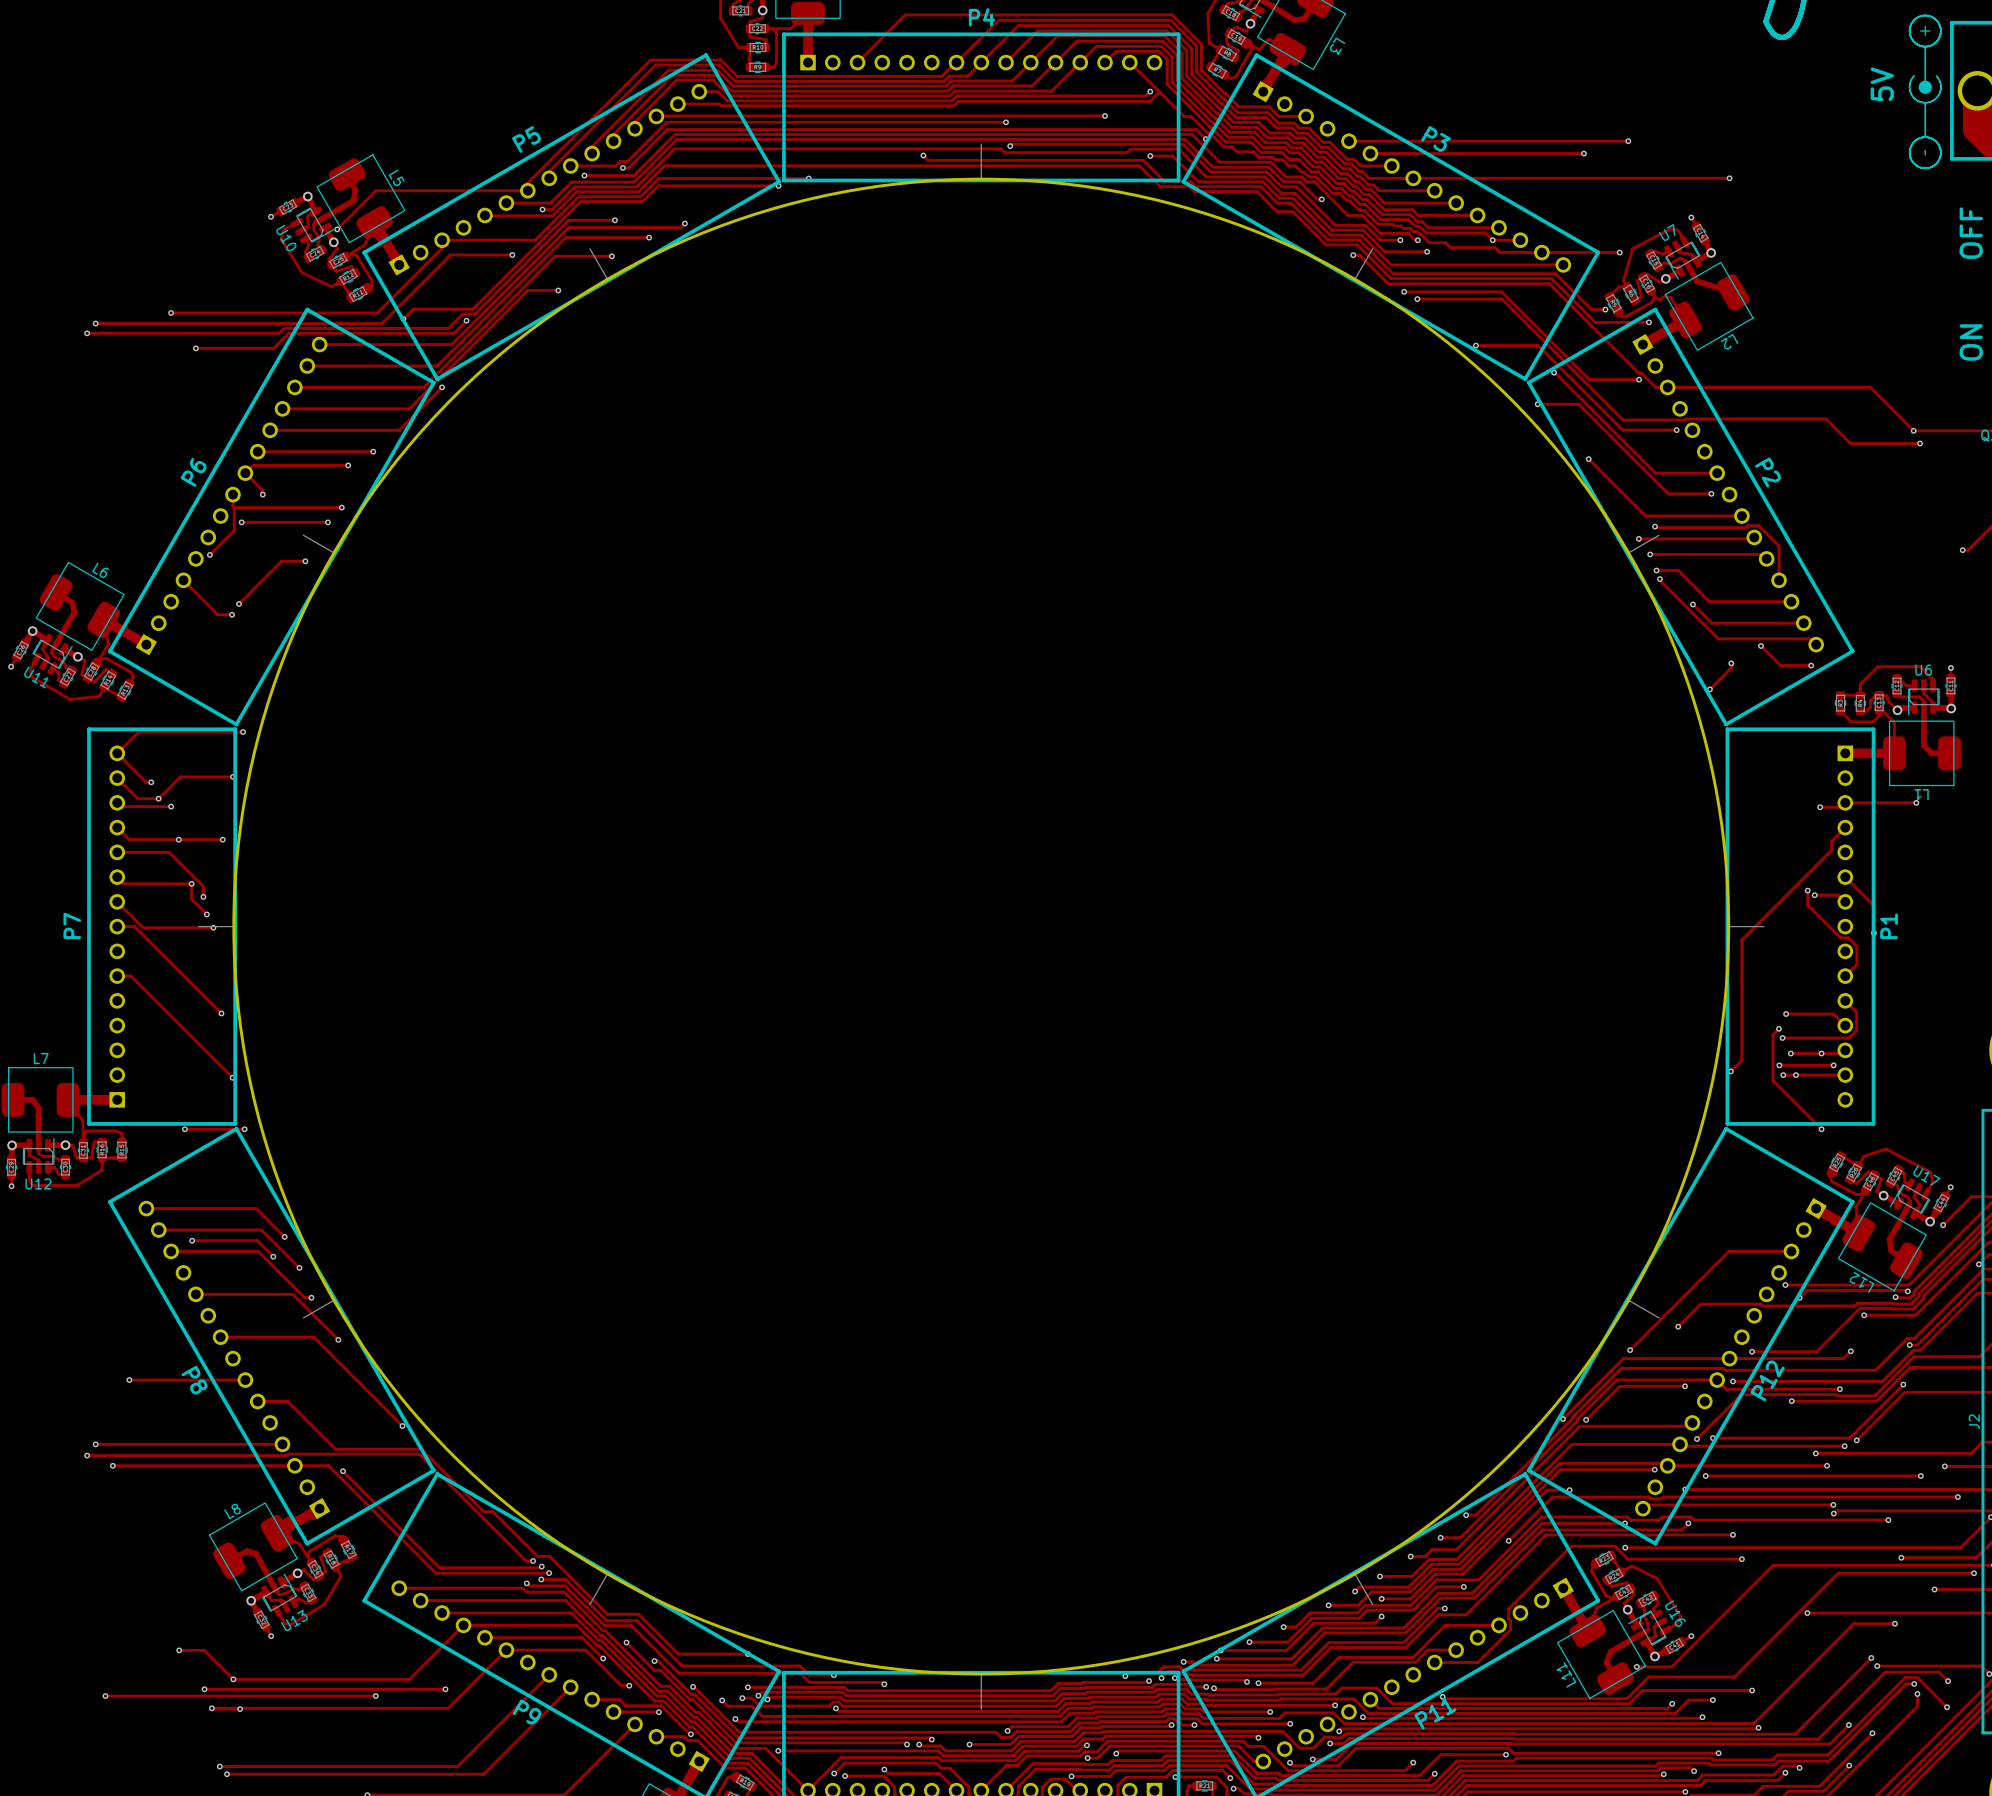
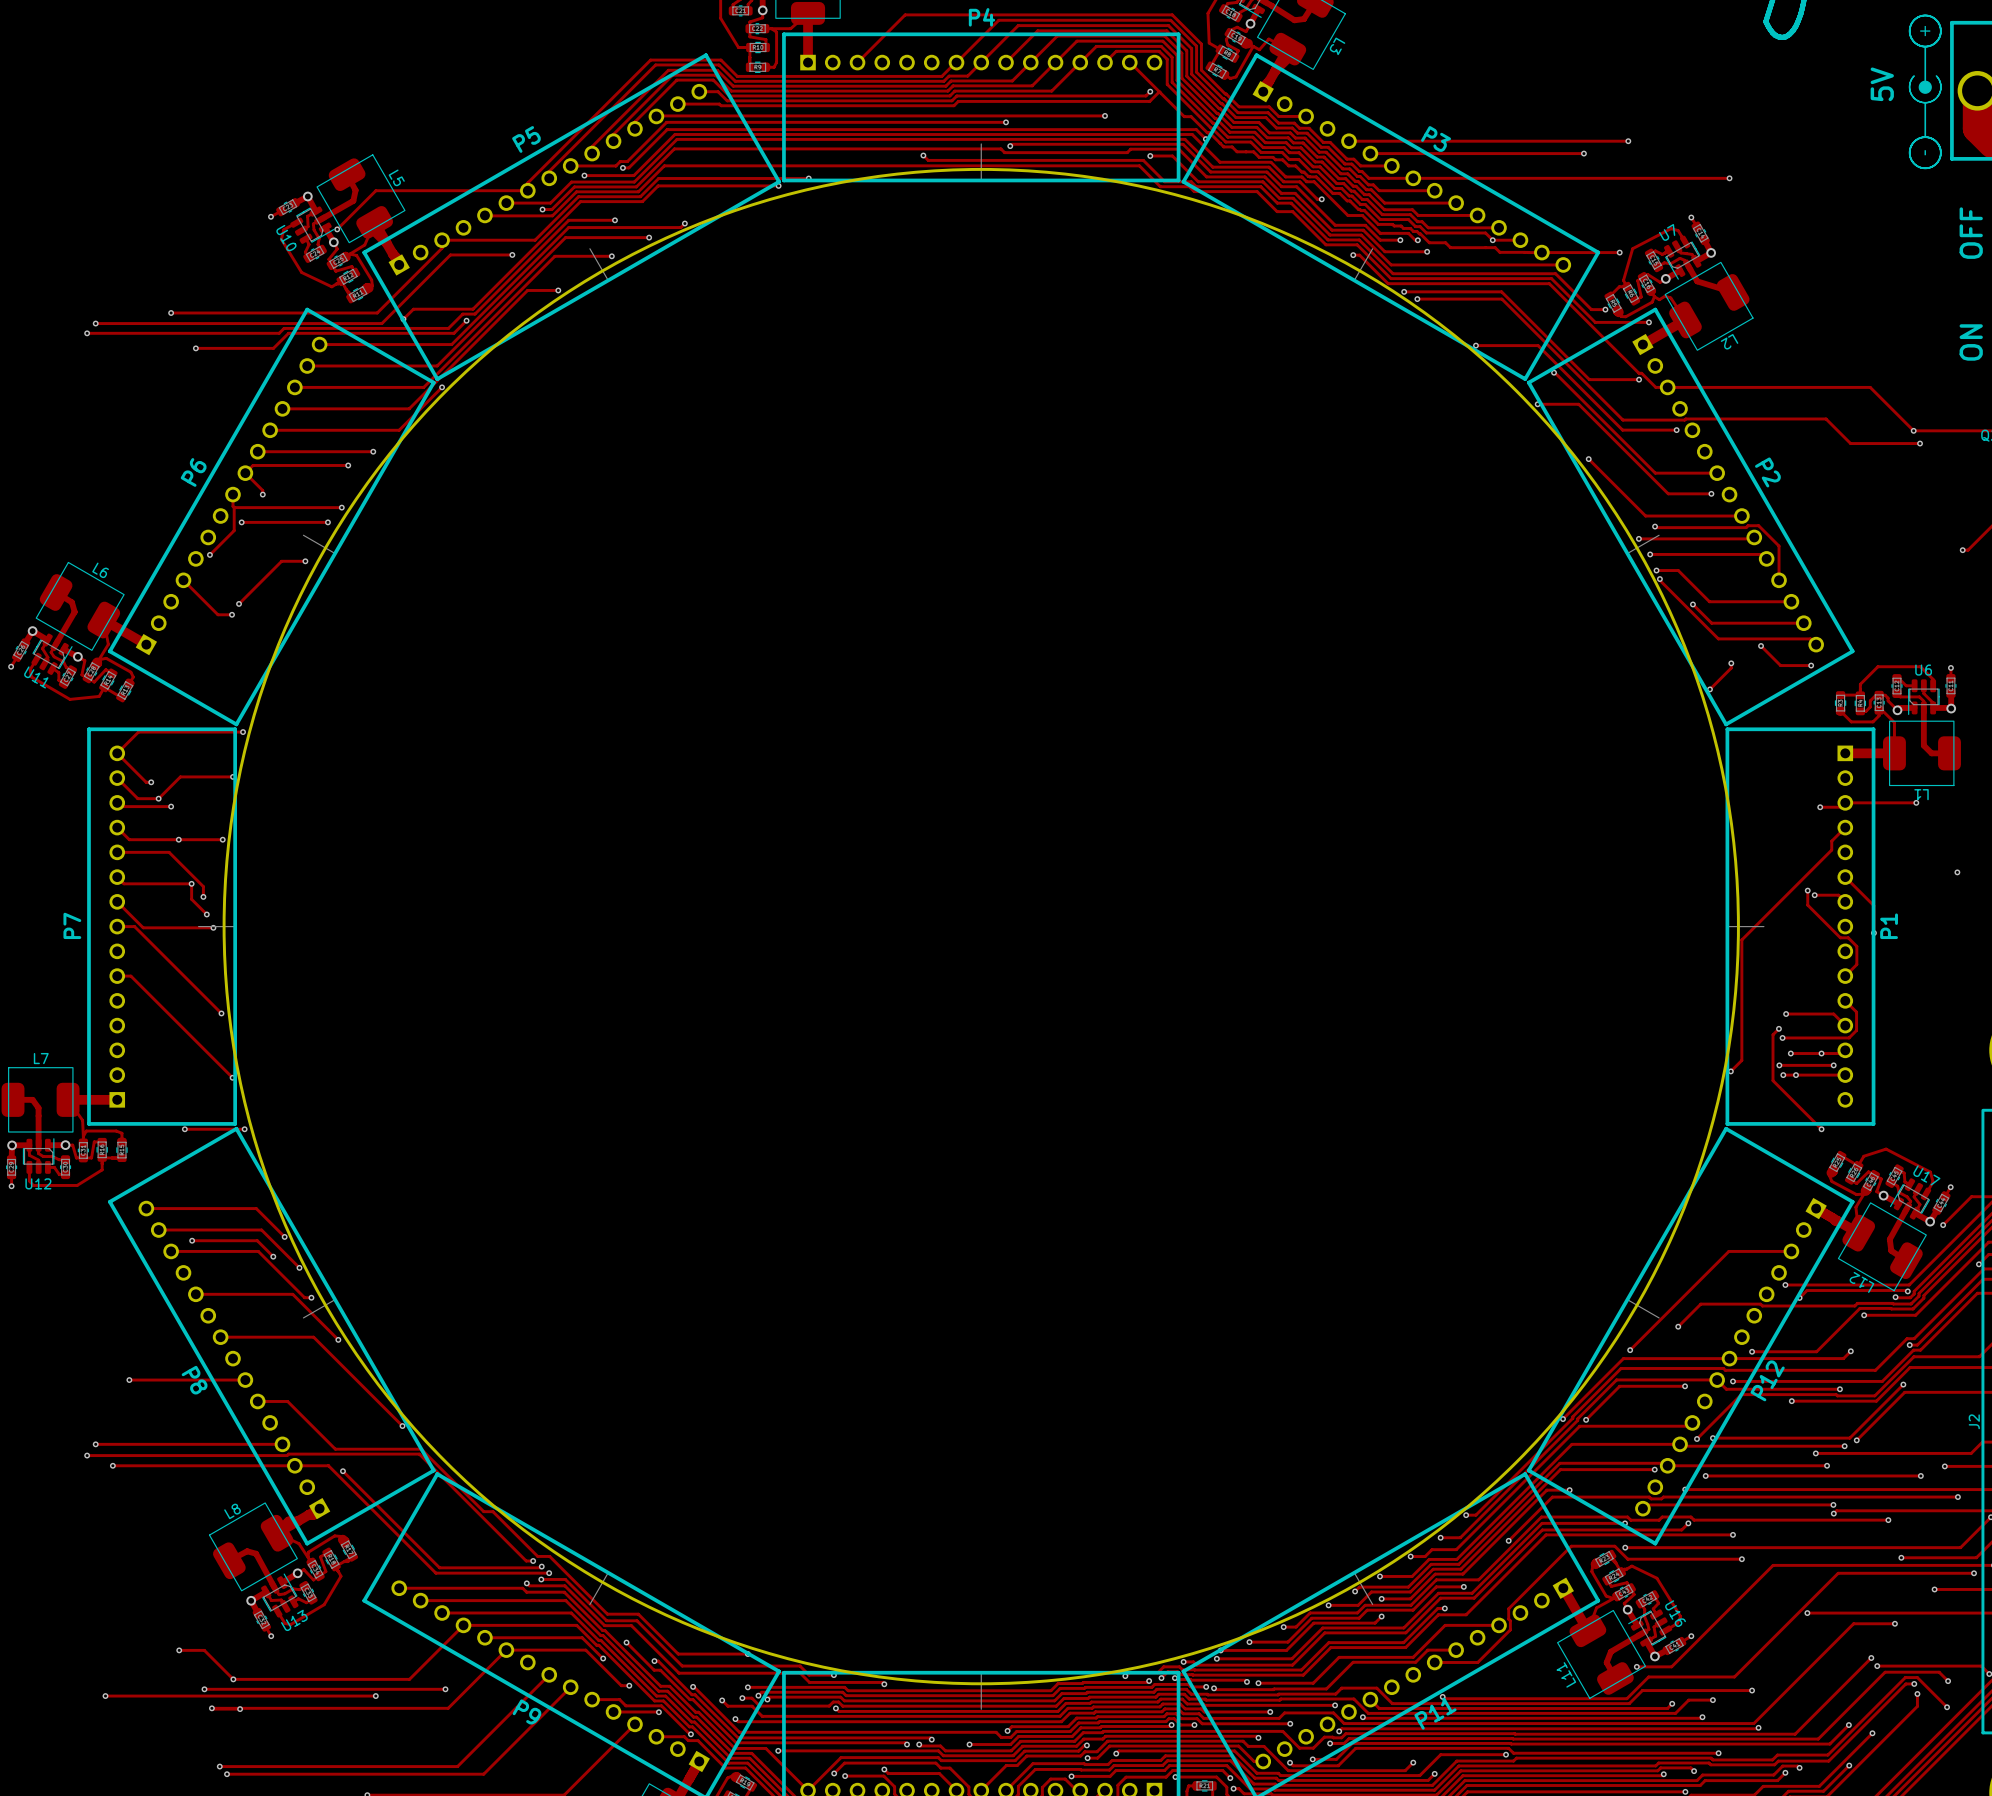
round board edge size: [232, 177, 1731, 1676] -> [222, 167, 1740, 1686]
via: none -> (1957, 872)

